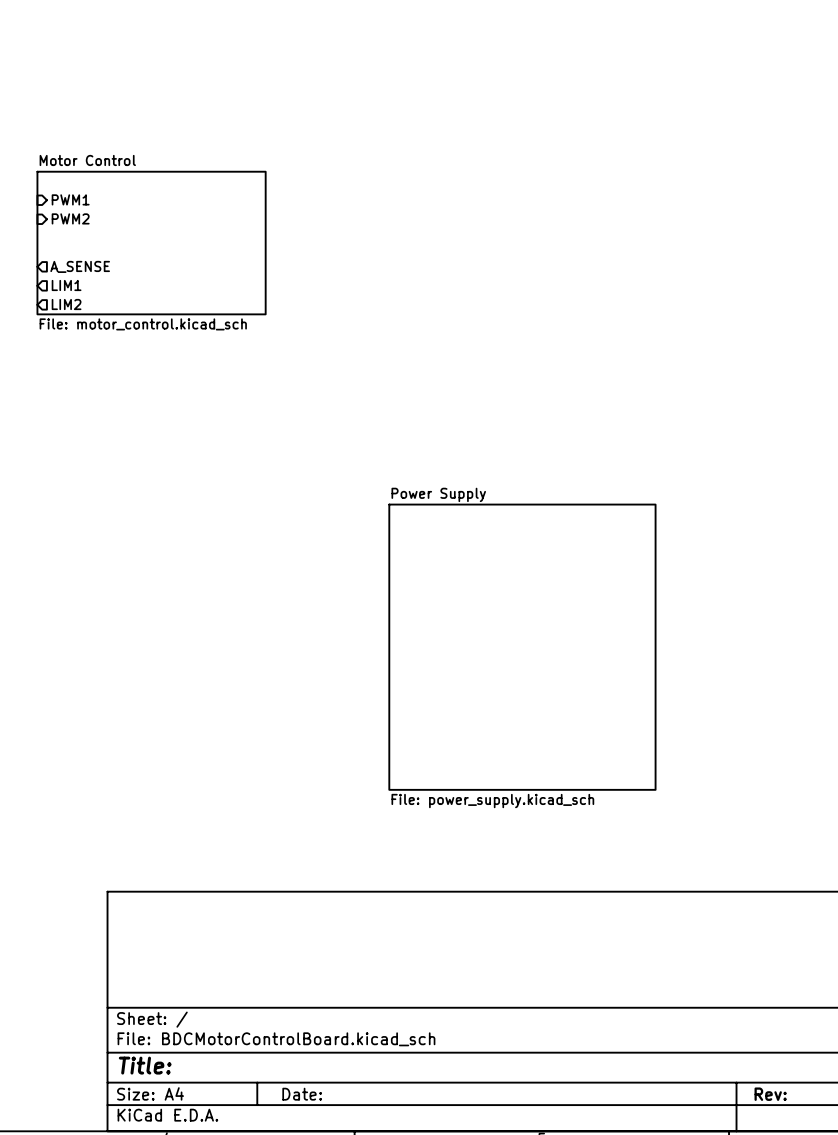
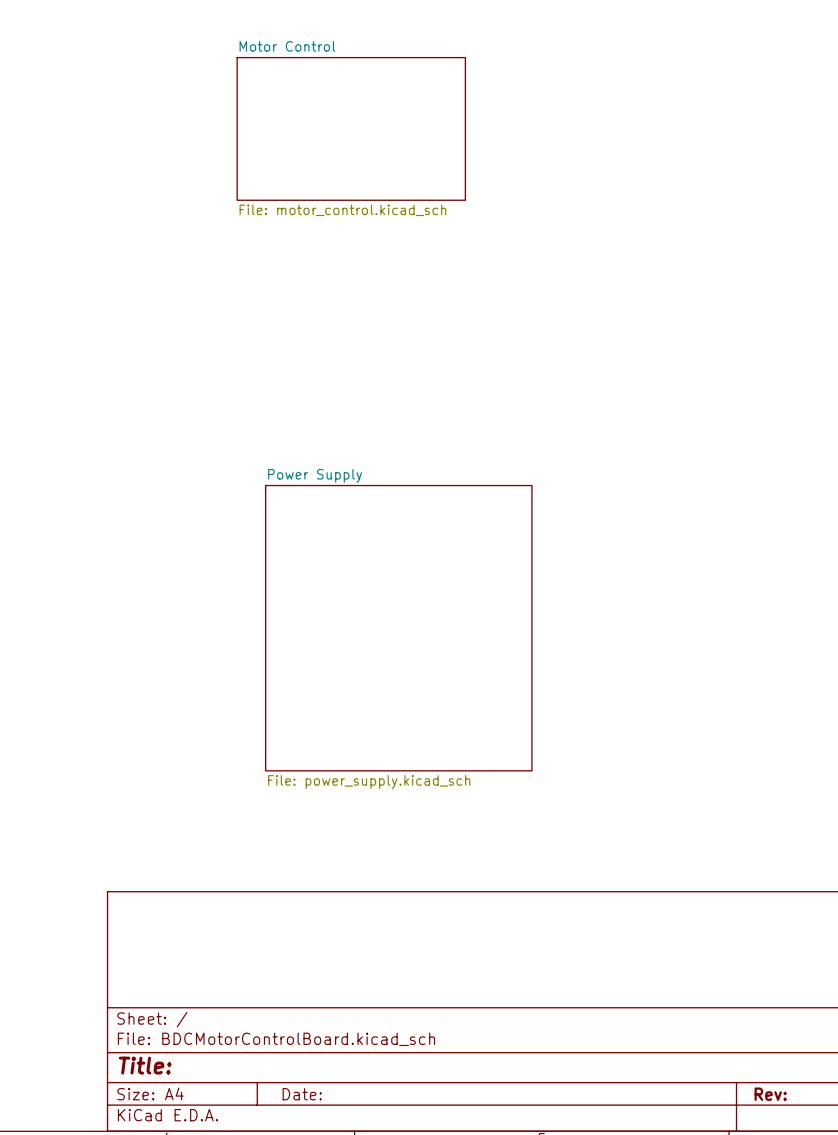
sheet Motor Control: none -> File: motor_control.kicad_sch (351, 128)
sheet pin: PWM1 (70, 199) -> none
sheet pin: PWM2 (70, 218) -> none
sheet Motor Control: File: motor_control.kicad_sch (151, 243) -> none
sheet pin: A_SENSE (80, 266) -> none
sheet pin: LIM1 (66, 285) -> none
sheet pin: LIM2 (66, 304) -> none
sheet Power Supply position: (522, 647) -> (398, 628)

